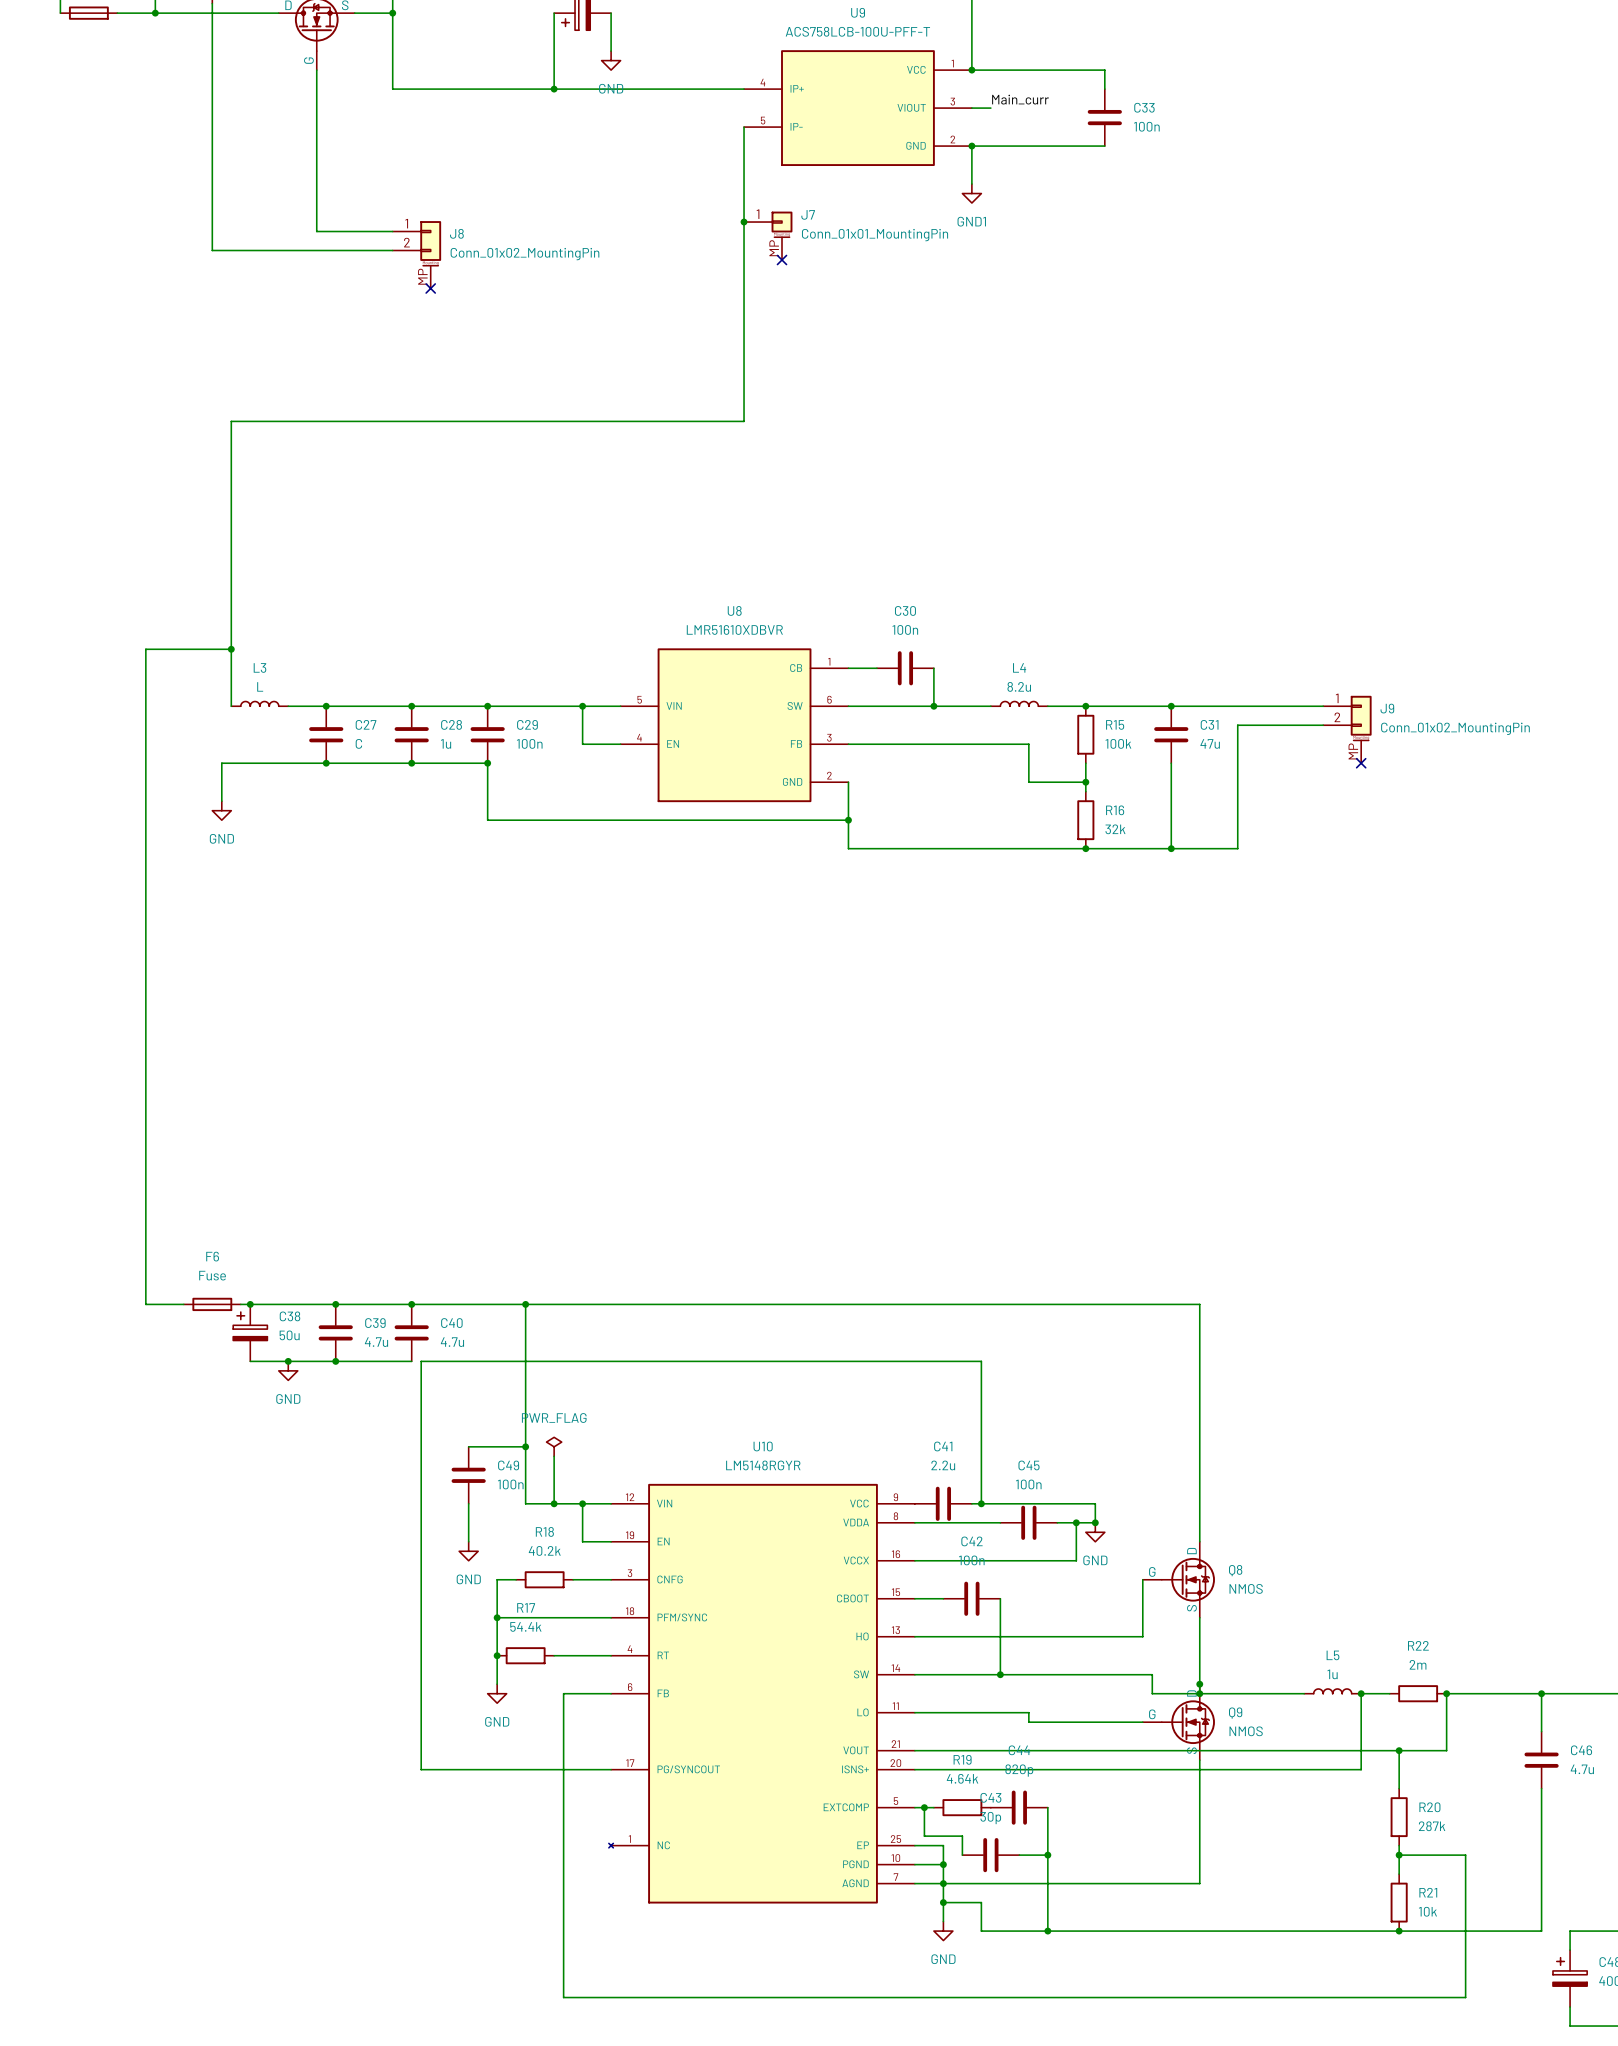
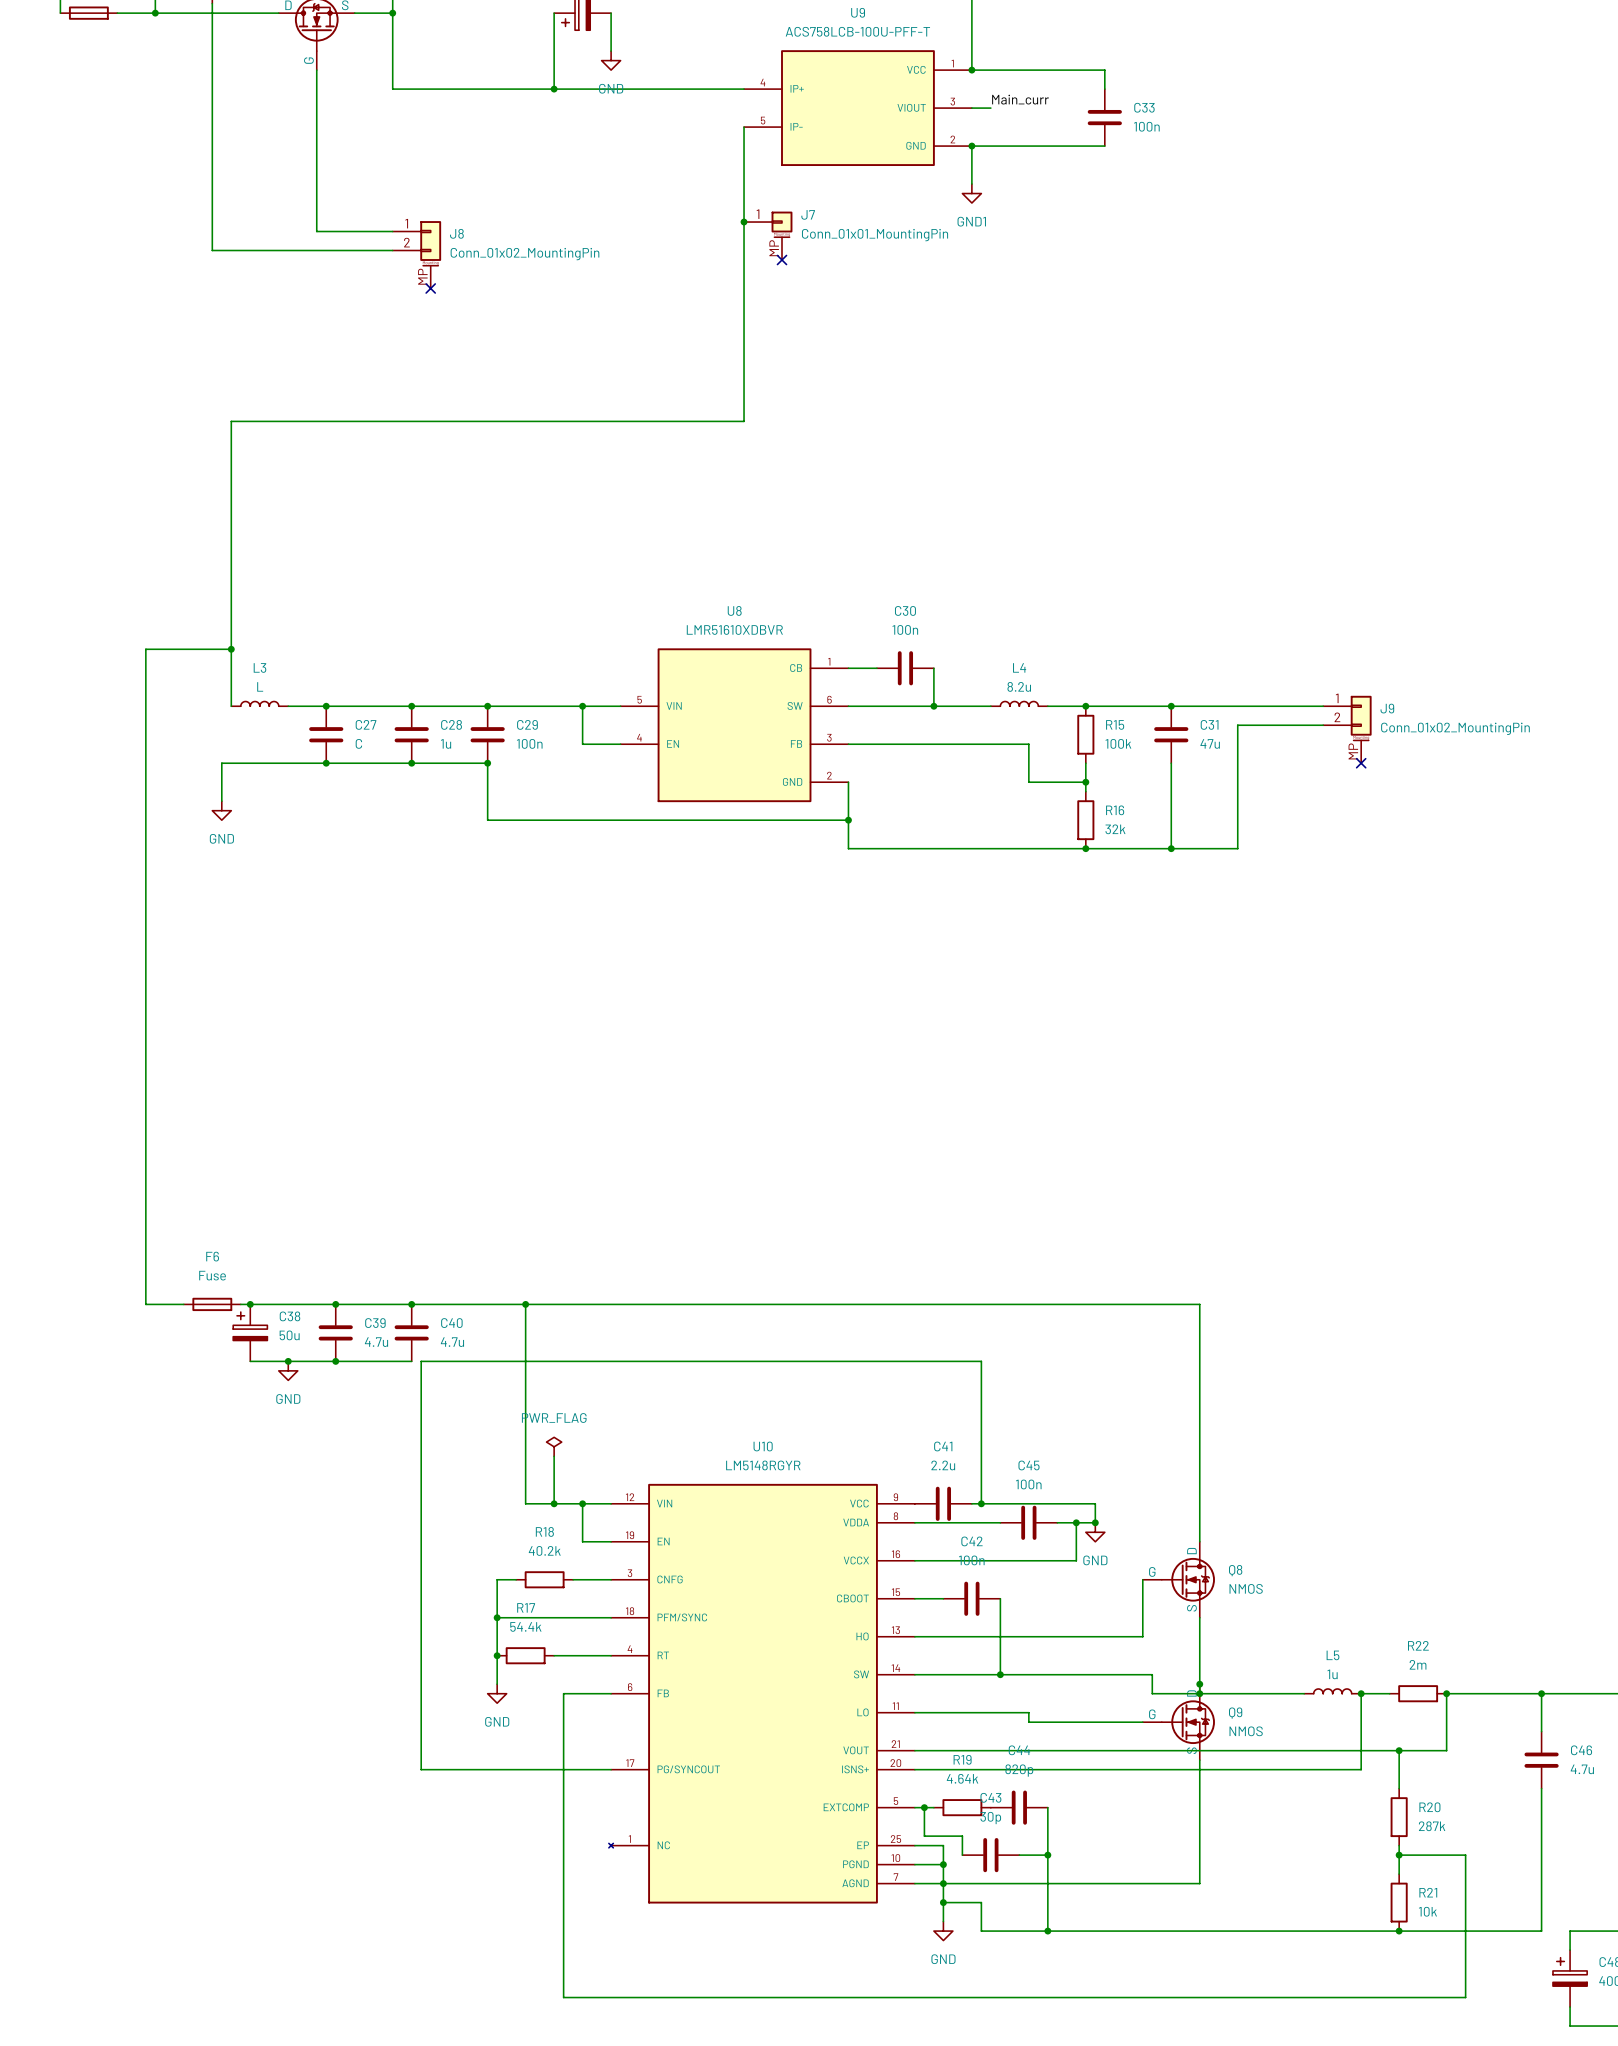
wire: (468, 1446) (525, 1446) -> none
junction: (525, 1446) -> none
C49: 100n (468, 1475) -> none
wire: (468, 1503) (468, 1541) -> none
power symbol: GND (468, 1551) -> none

